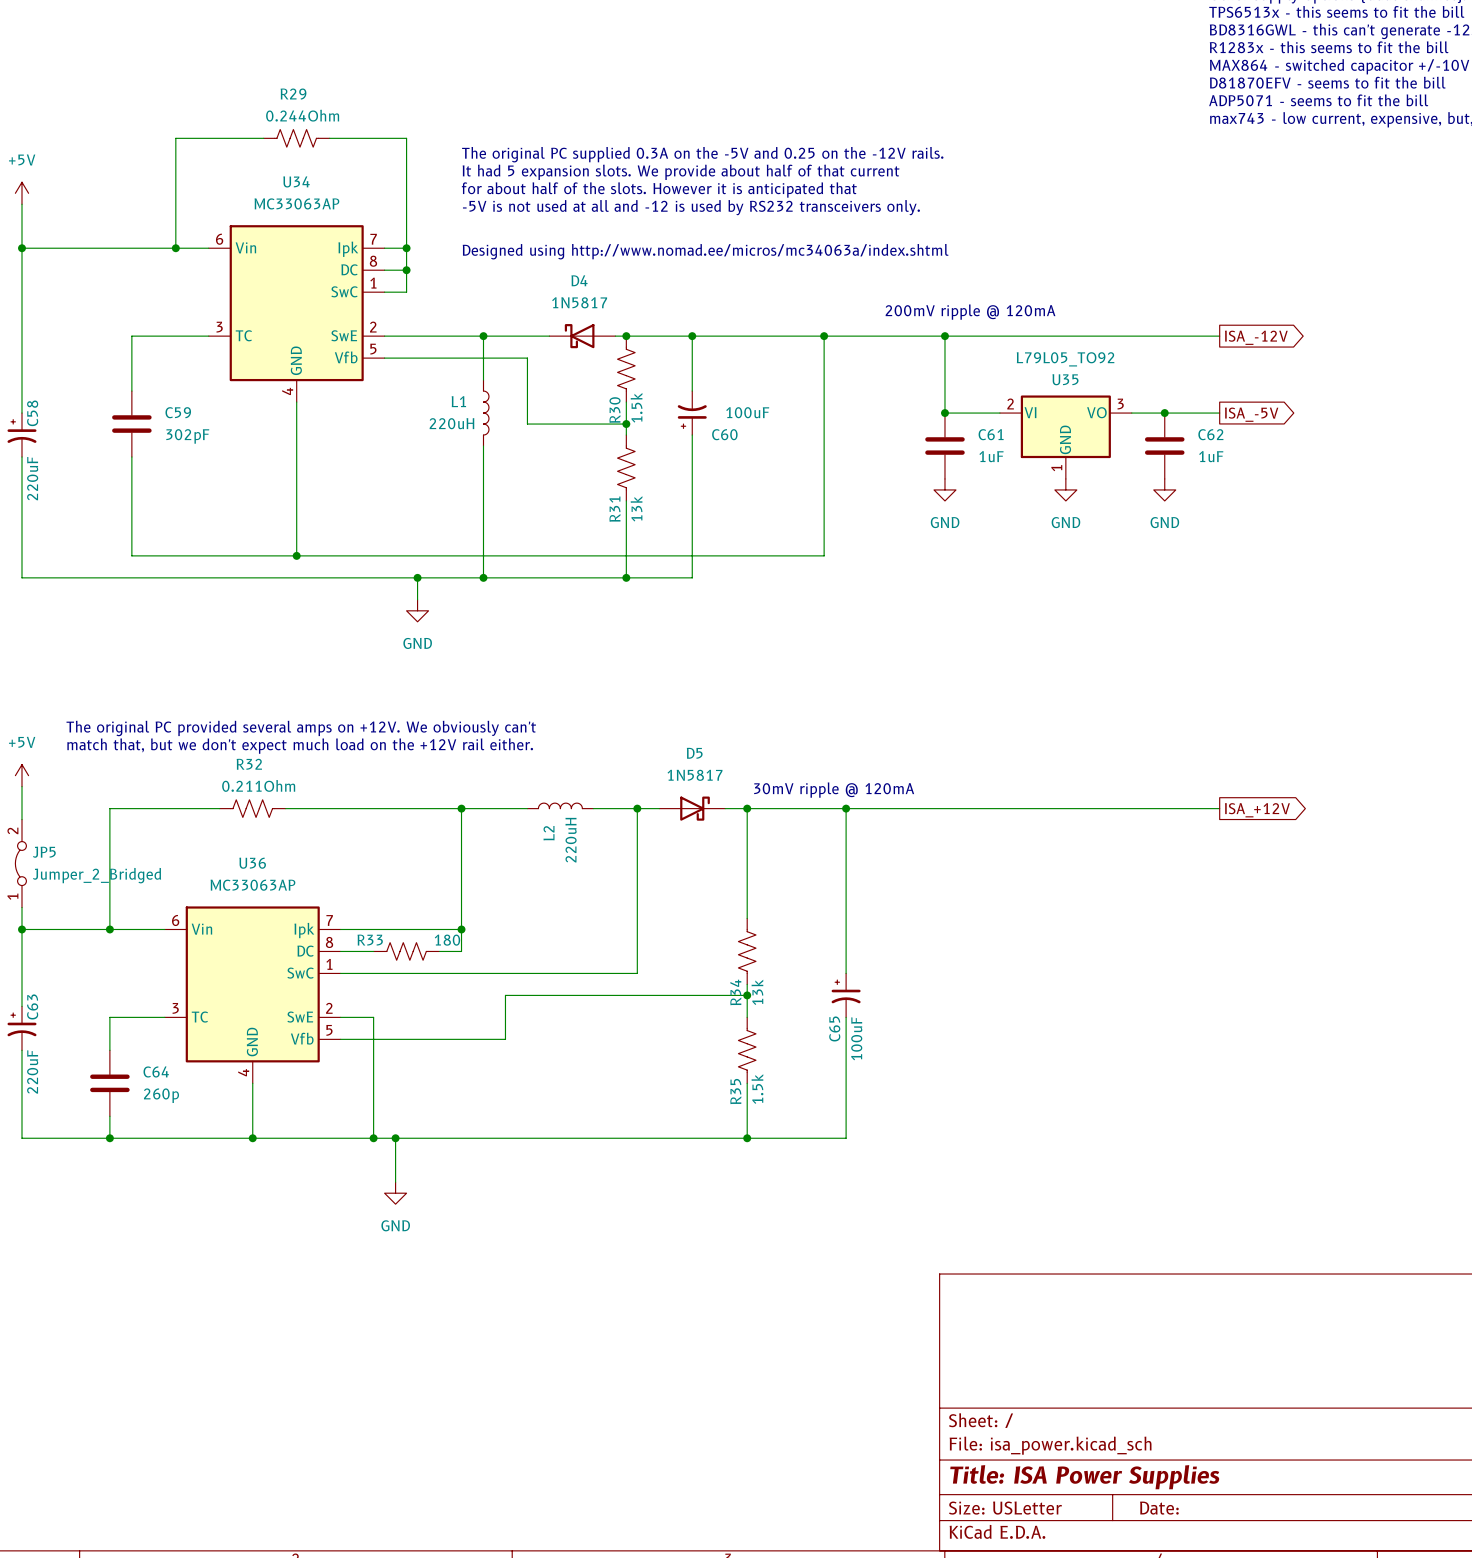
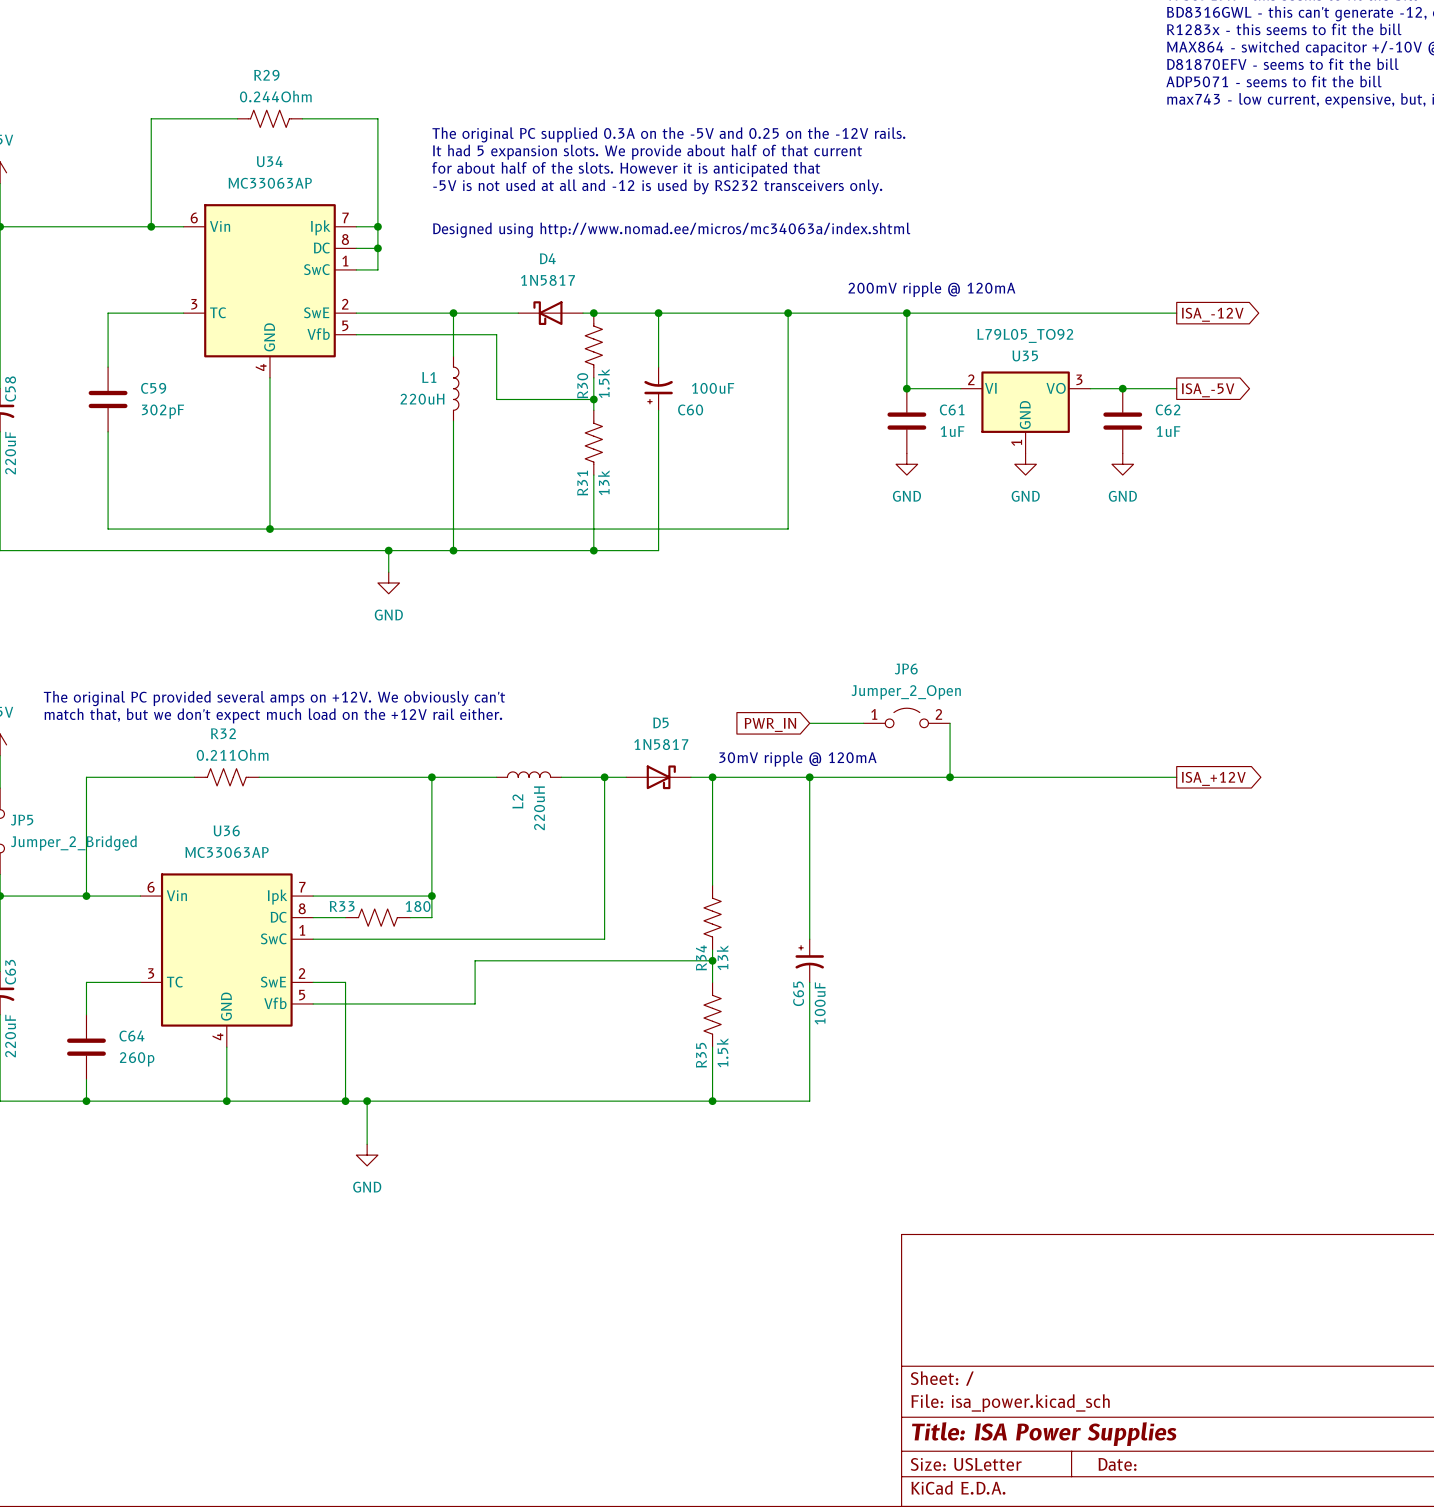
JP6: none -> Jumper_2_Open (906, 717)
wire: none -> (809, 723) (863, 723)
wire: none -> (950, 723) (950, 777)
global label: none -> PWR_IN (770, 724)
junction: none -> (950, 777)

